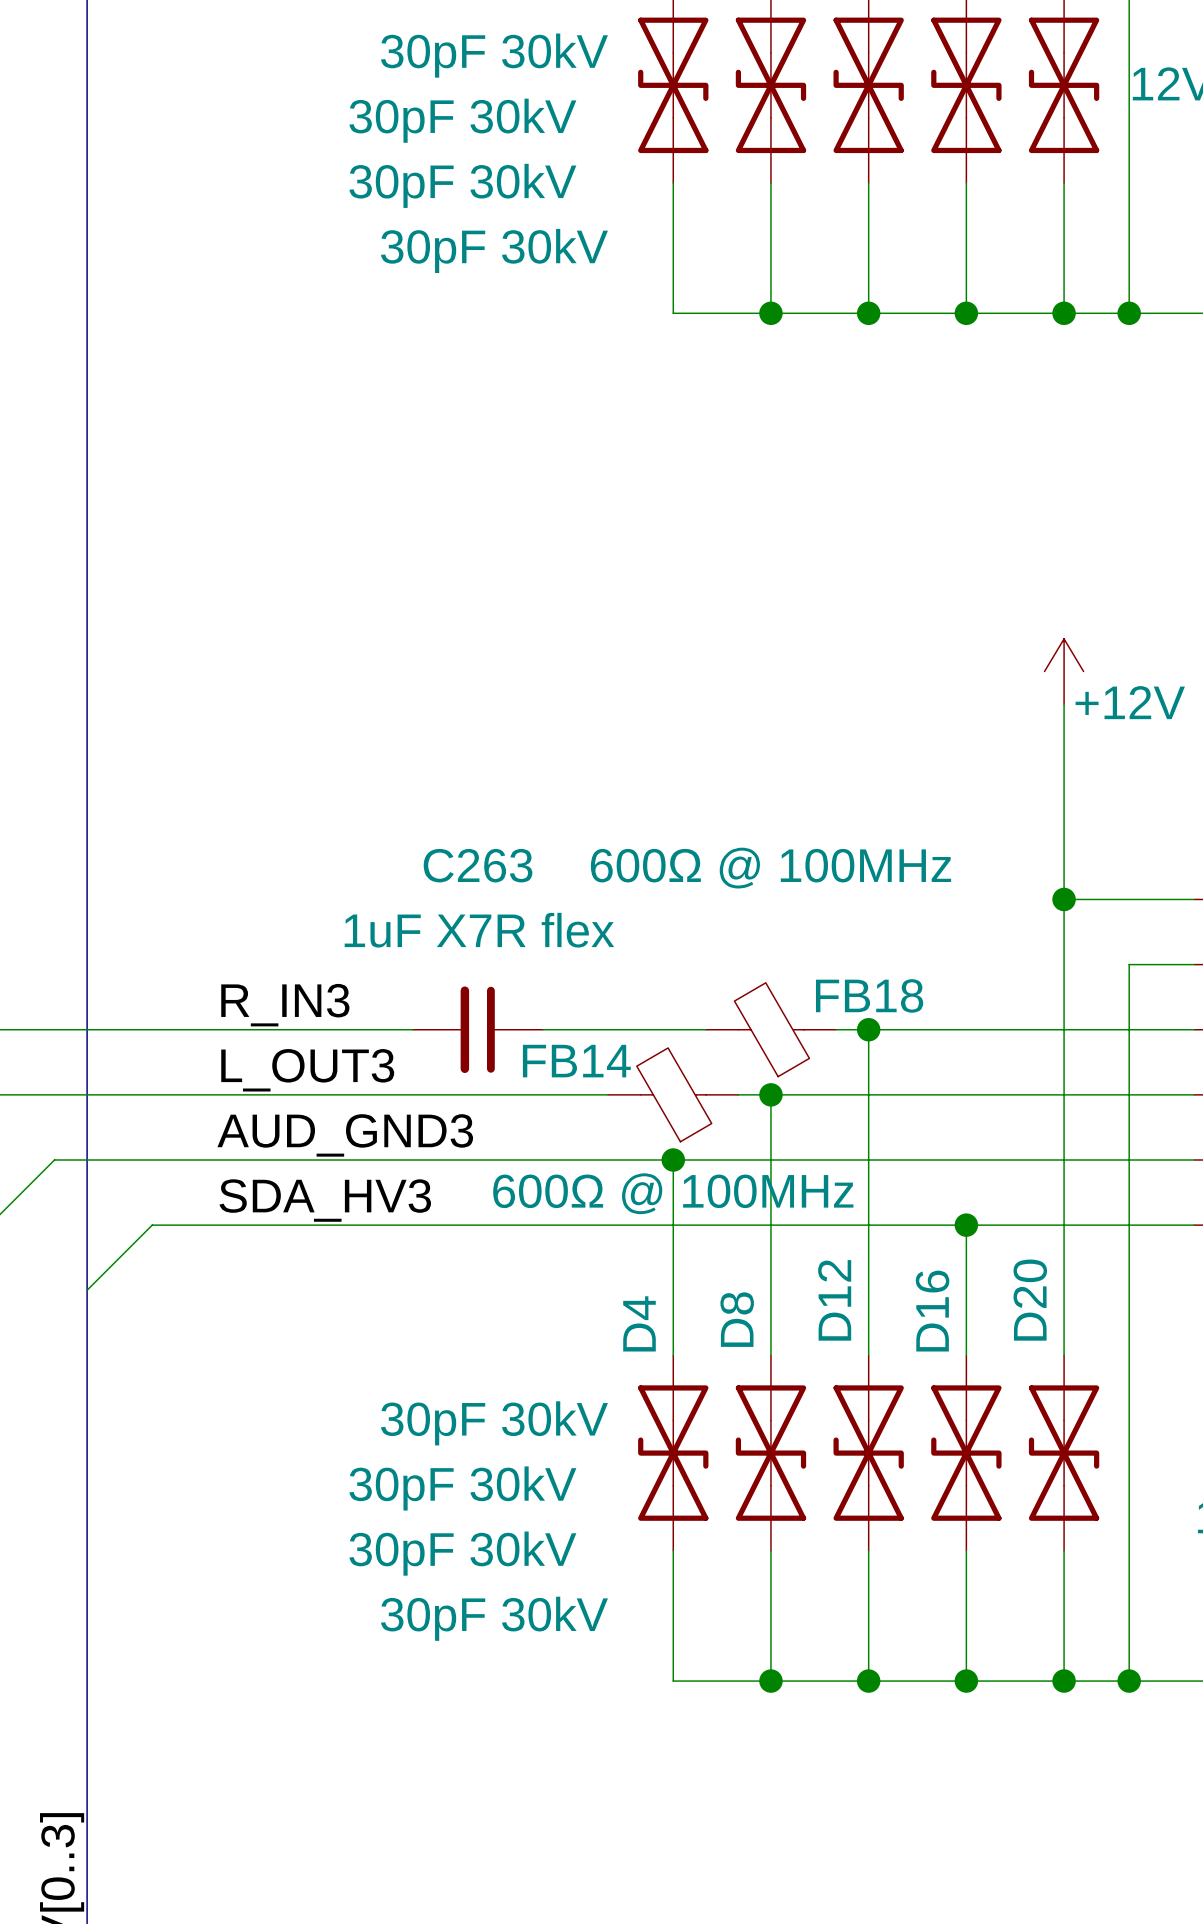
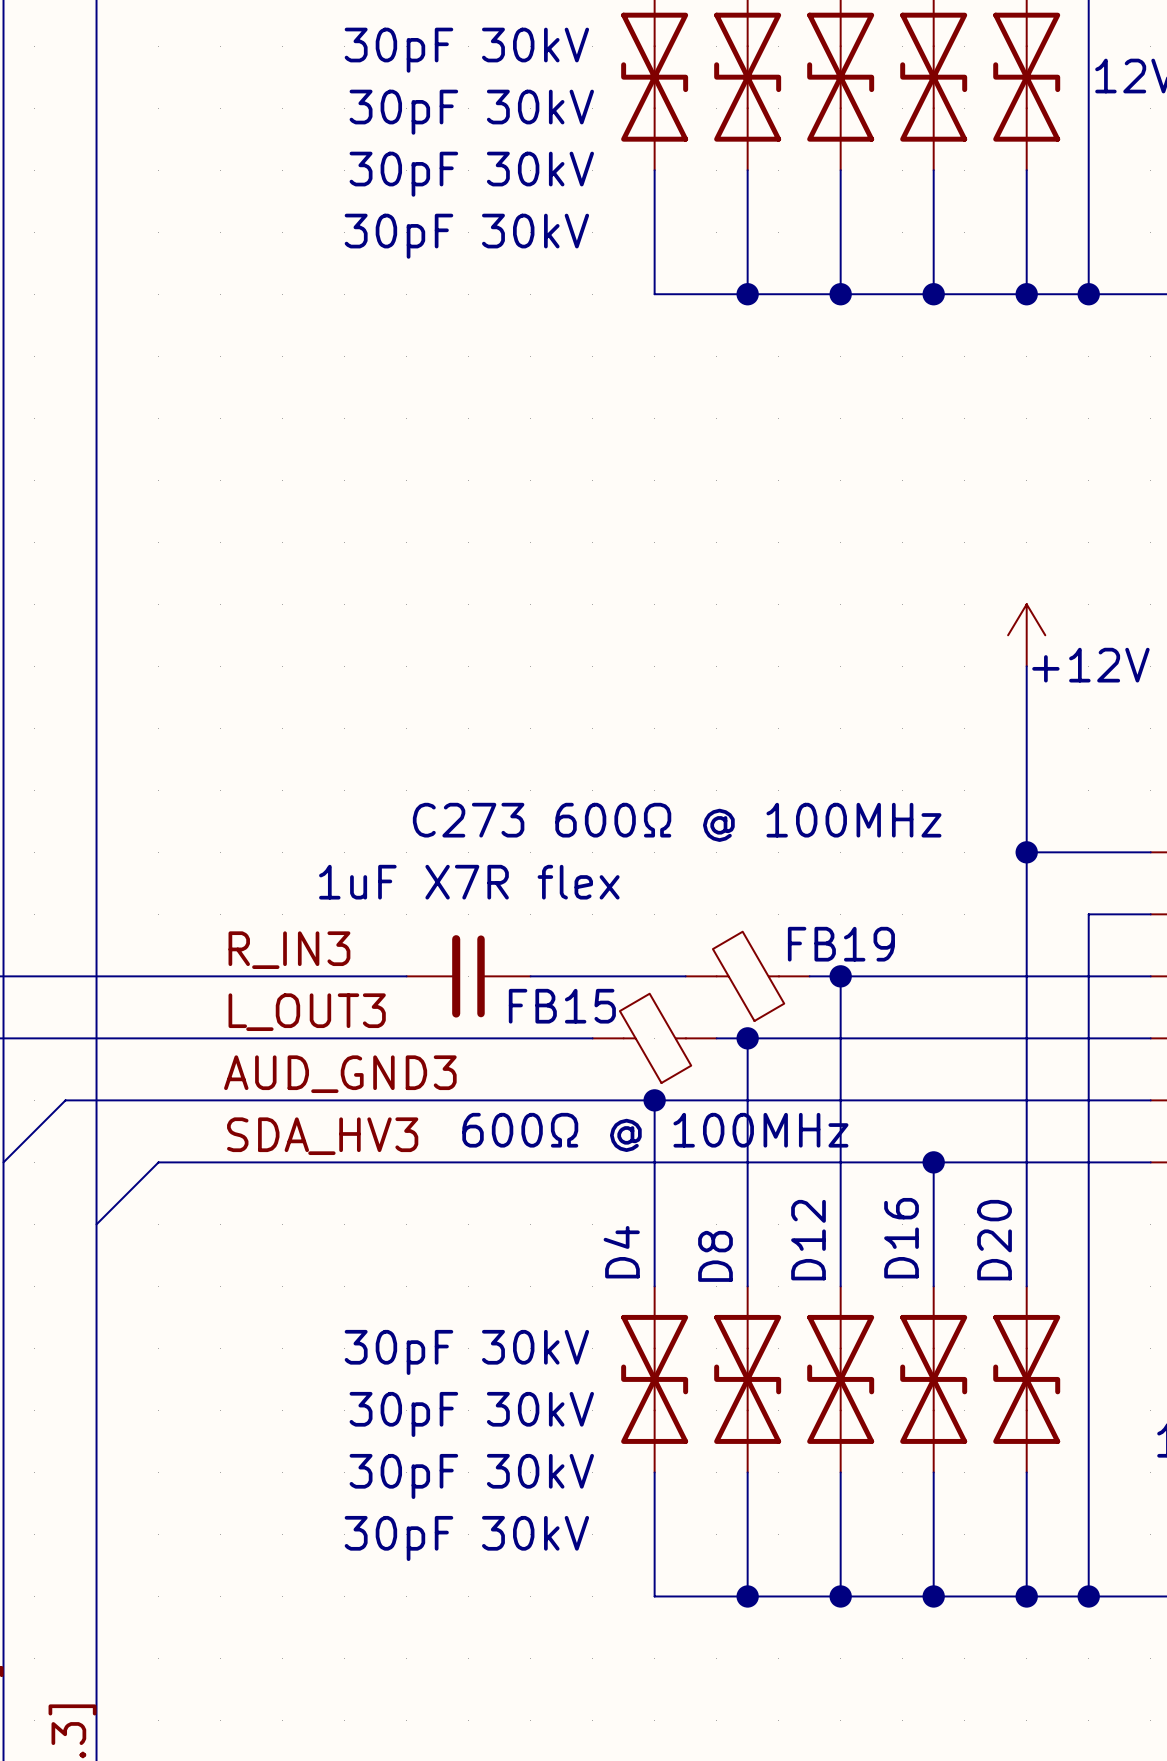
C263 name: C263 (478, 865) -> C273 (468, 820)
FB18 name: FB18 (869, 995) -> FB19 (841, 944)
FB14 name: FB14 (576, 1061) -> FB15 (562, 1006)

